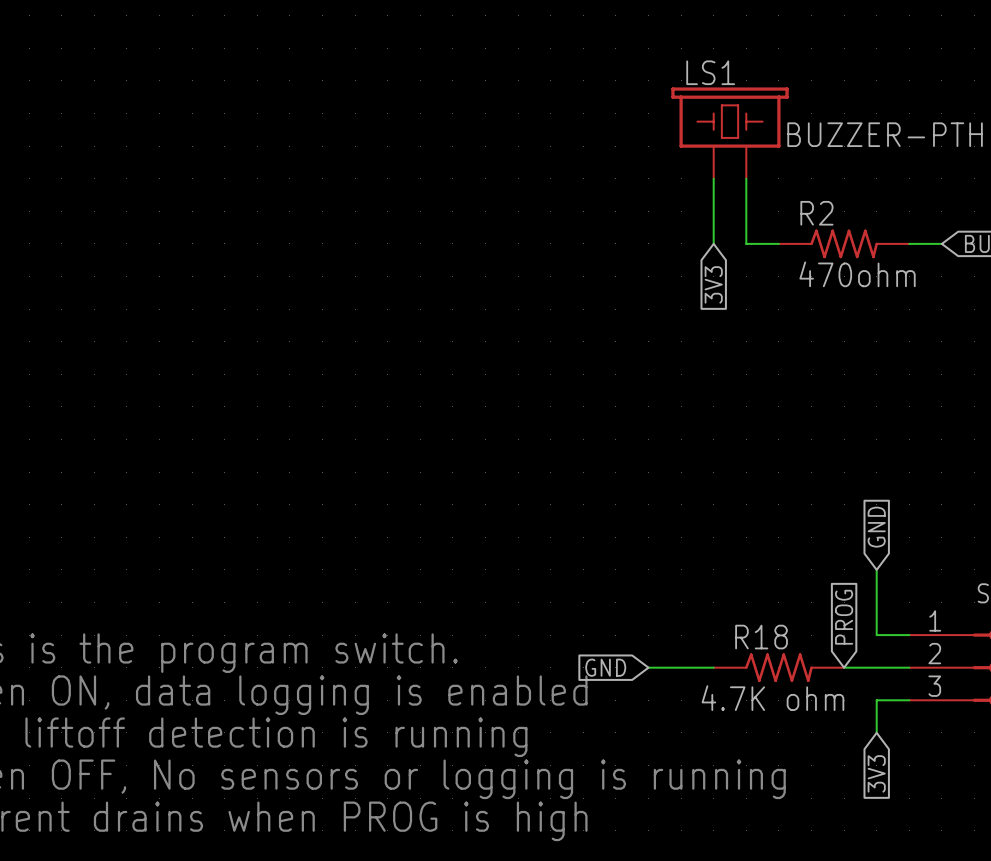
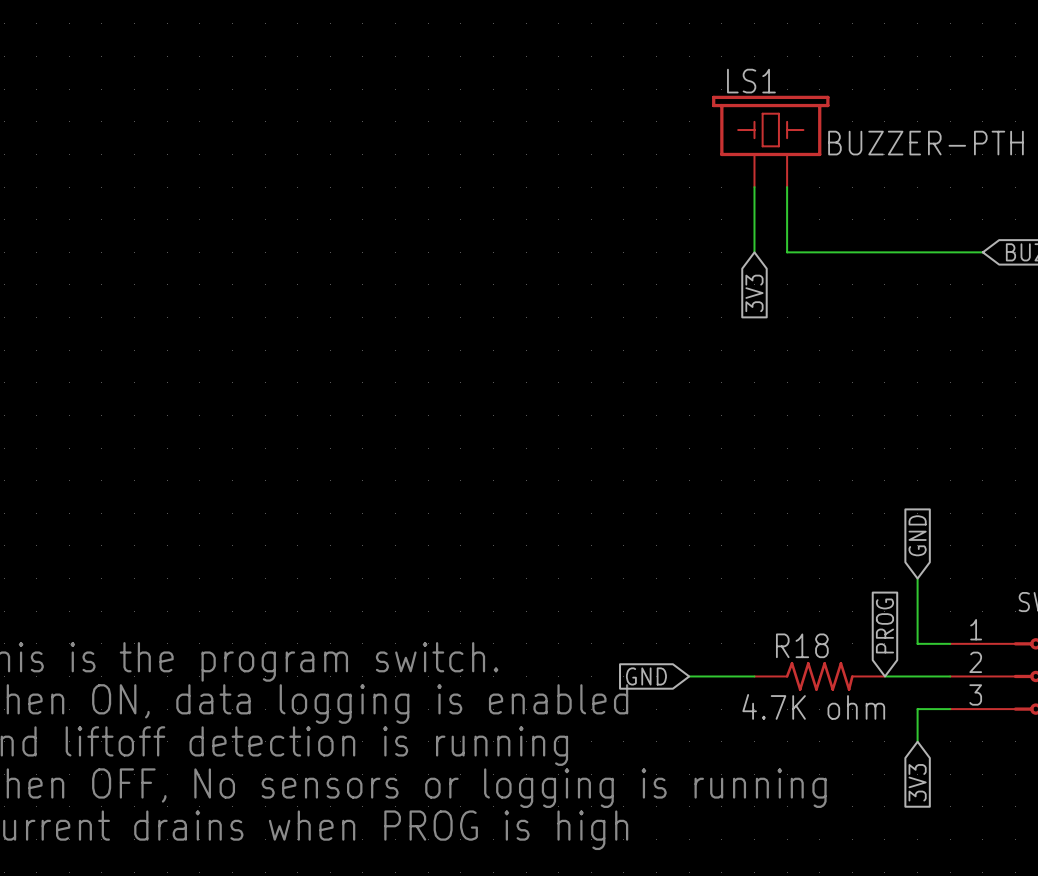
R2: 470ohm (844, 243) -> none

